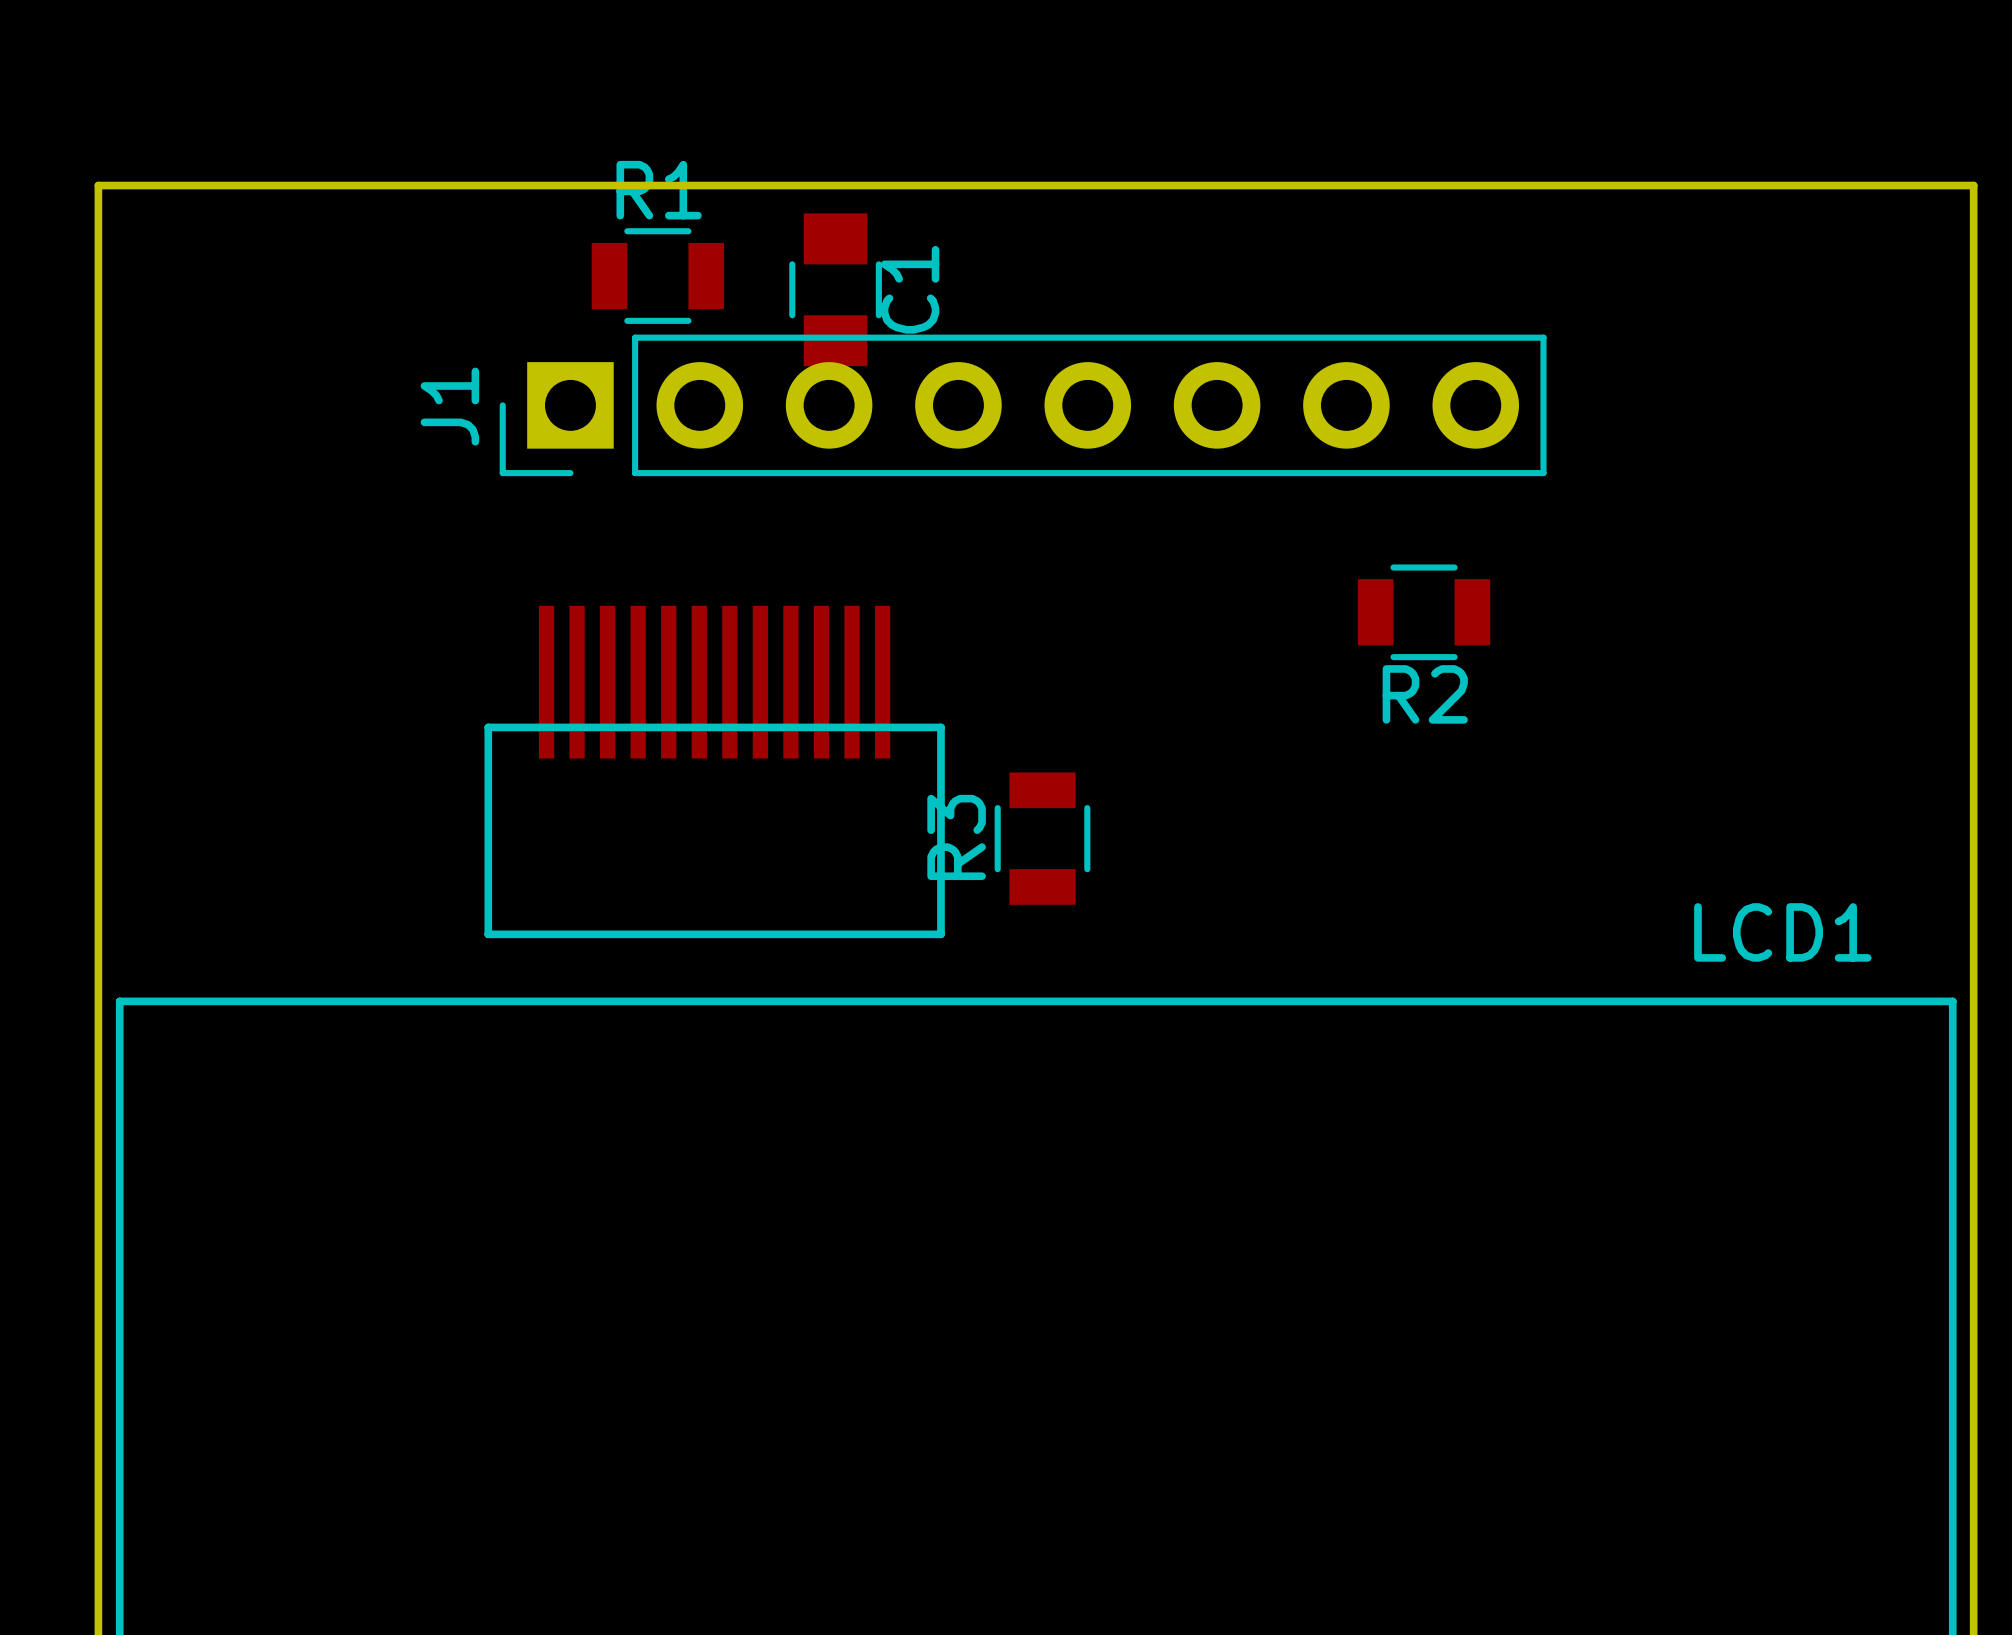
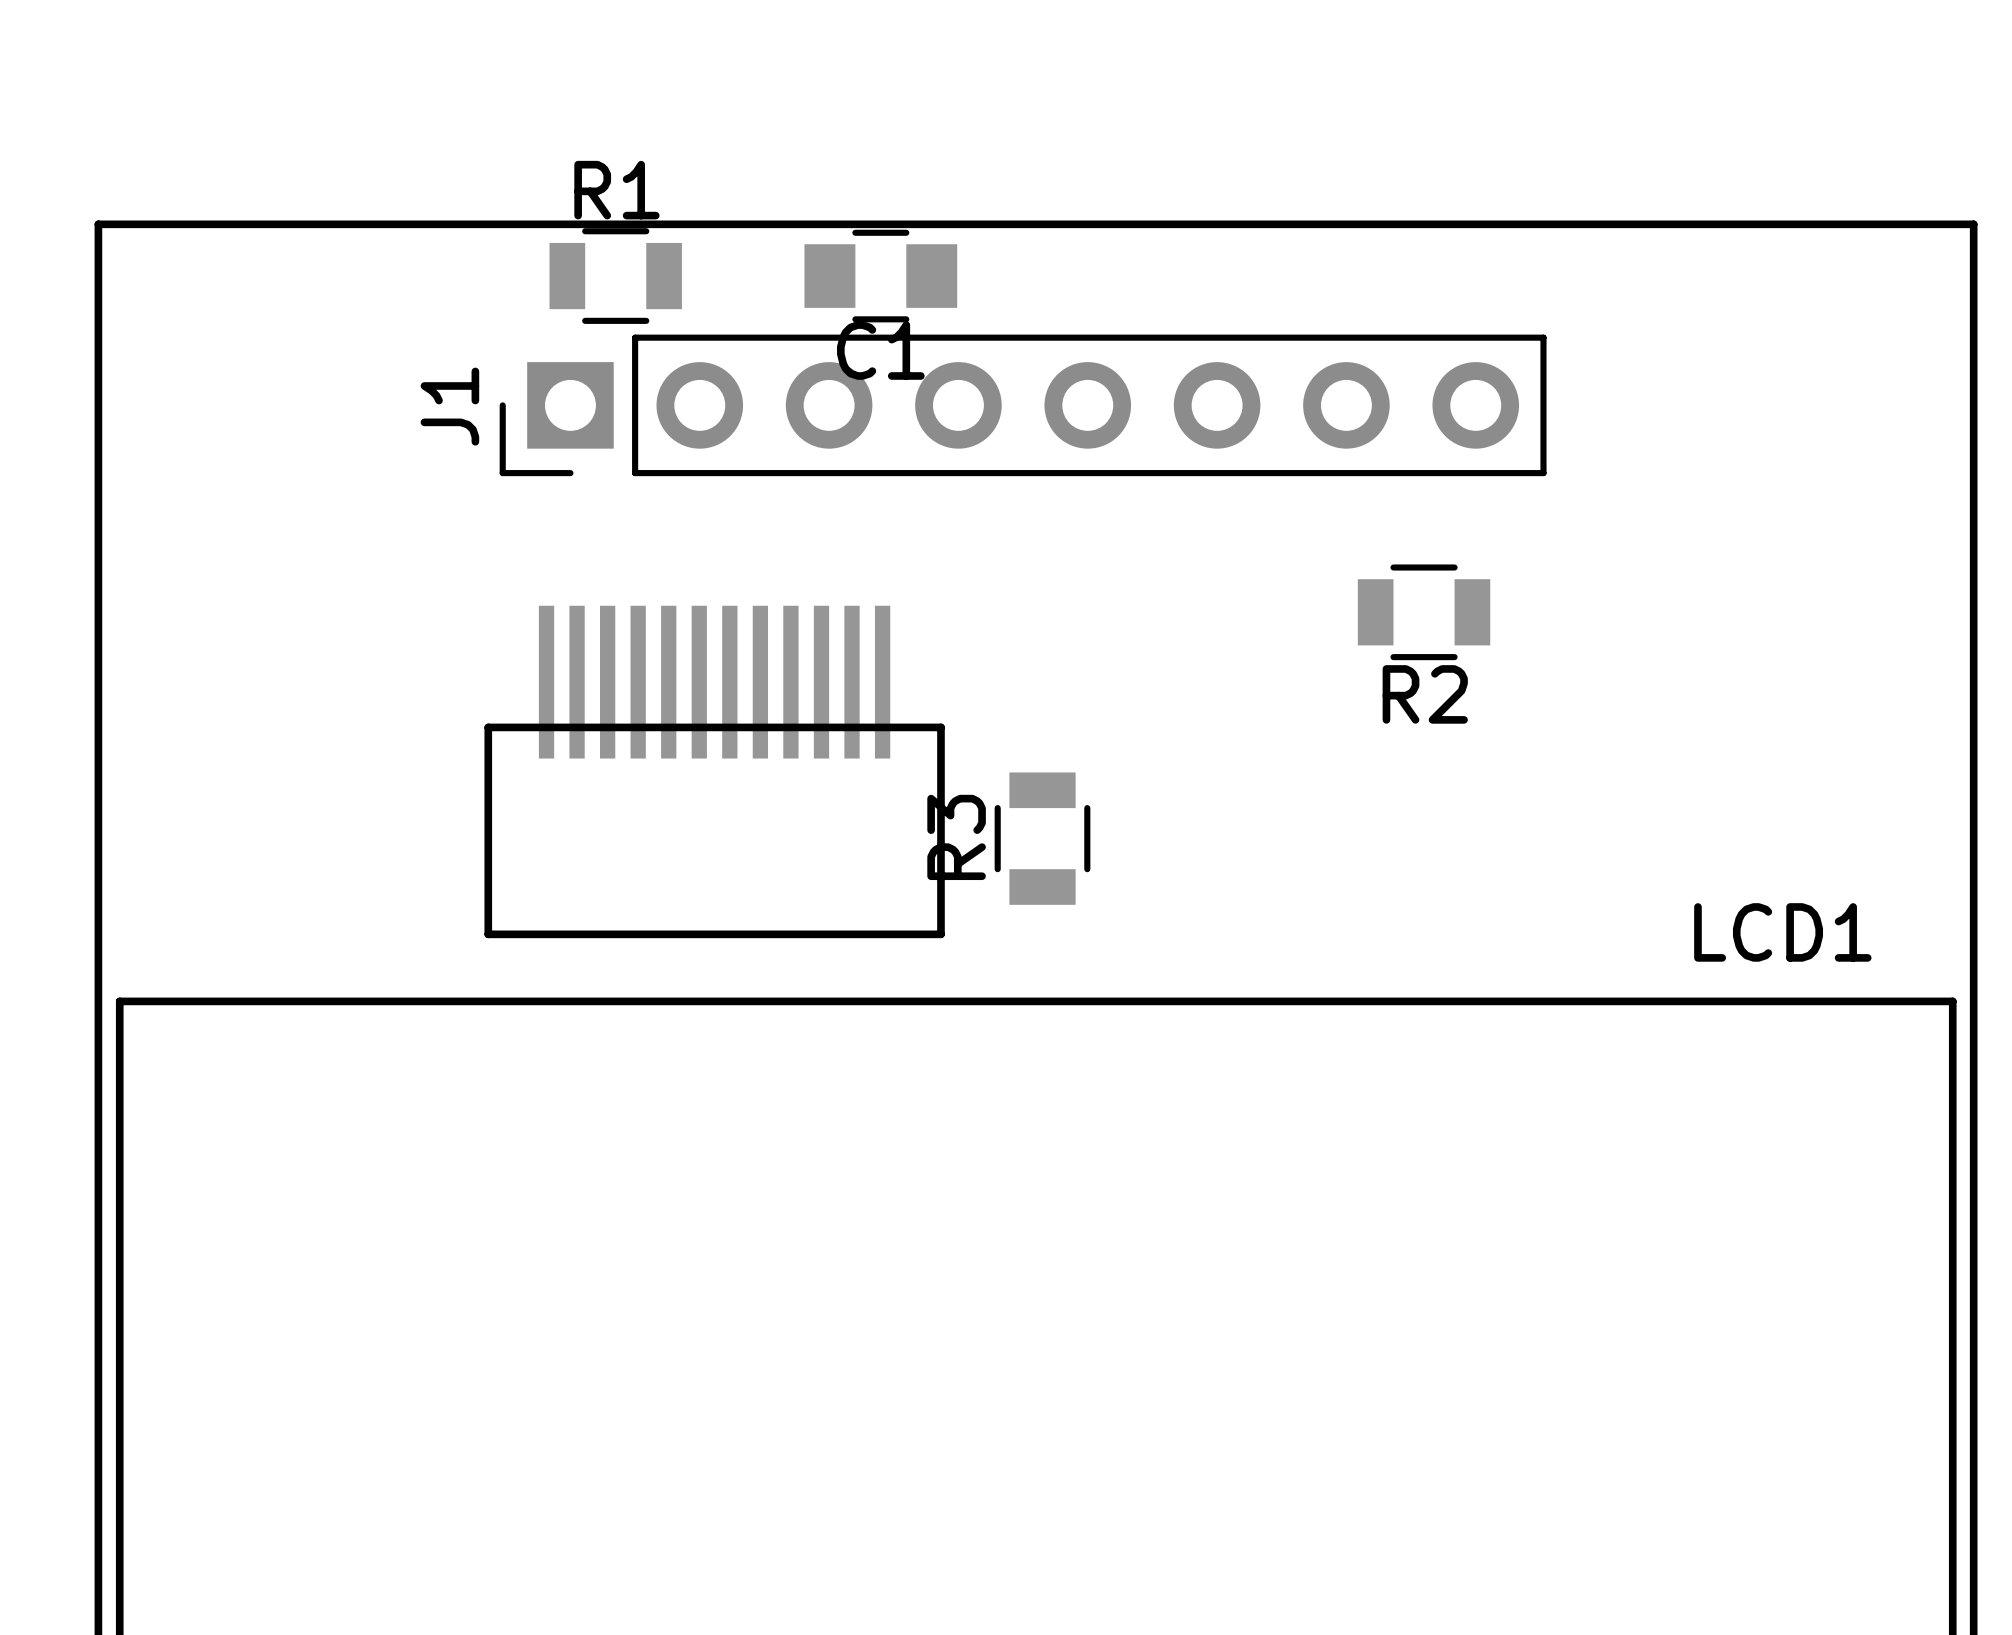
board edge: (98, 224) (98, 185) (1973, 185) (1973, 224) -> (98, 224) (1973, 224)
R1 position: (657, 276) -> (615, 276)
C1 rotation: 0° (835, 289) -> 90° clockwise (880, 276)

